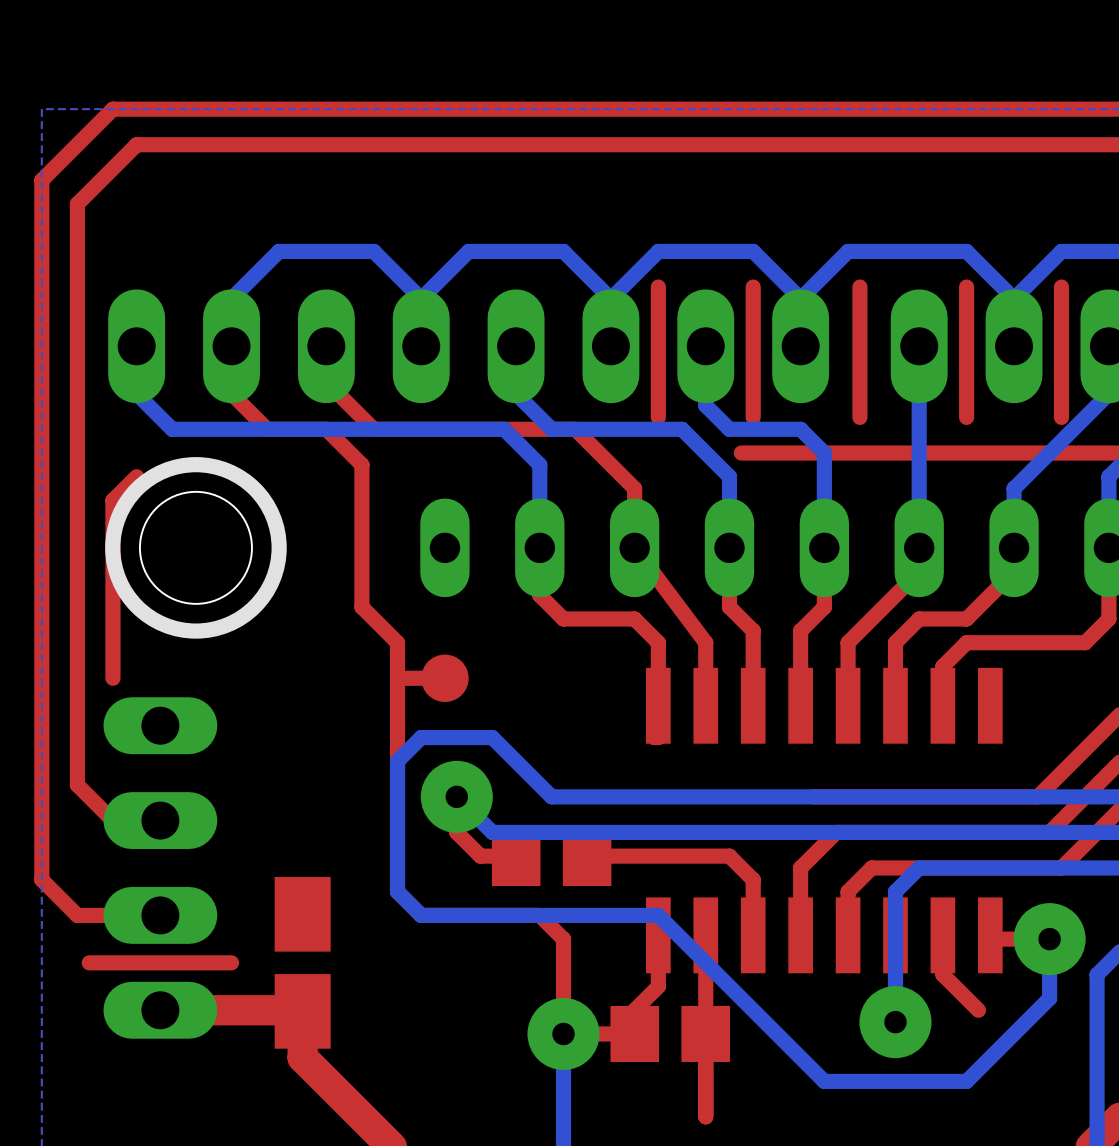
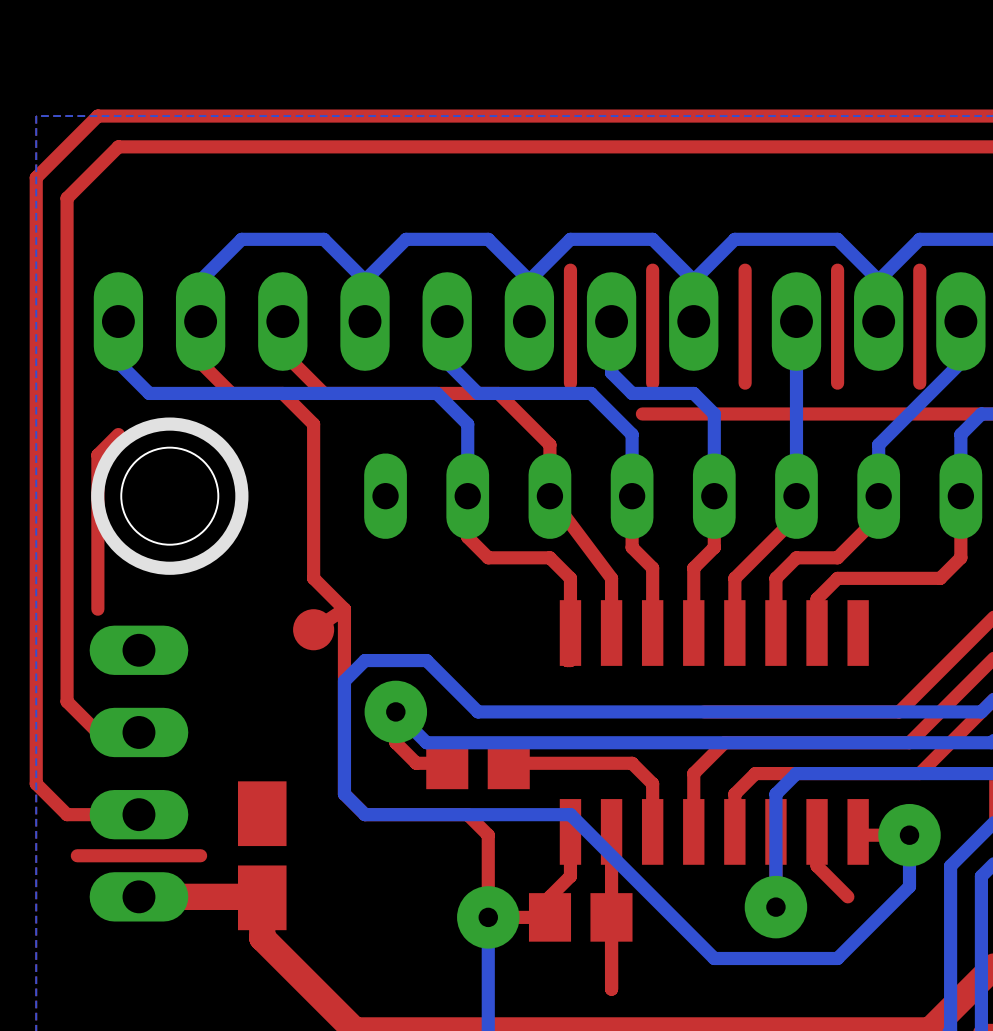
top track: (361, 607) (397, 642) (397, 678) (444, 678) -> (313, 547) (313, 578) (344, 609) (313, 629)
part position: (444, 678) -> (313, 629)

